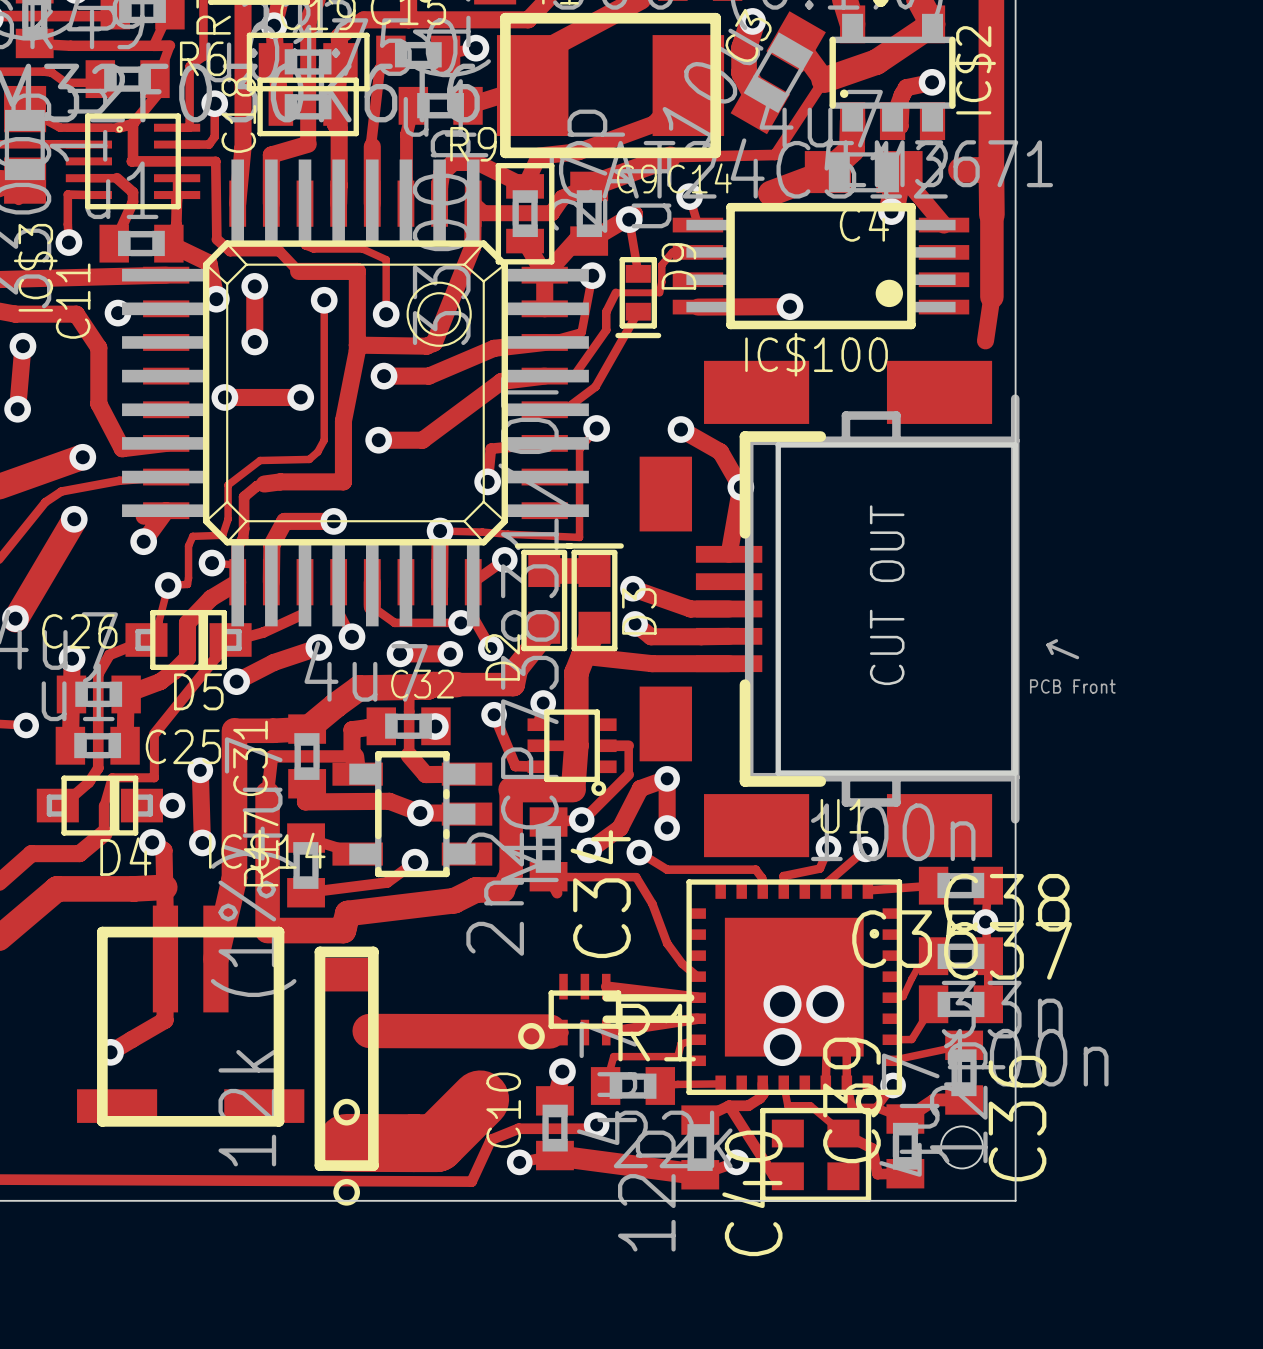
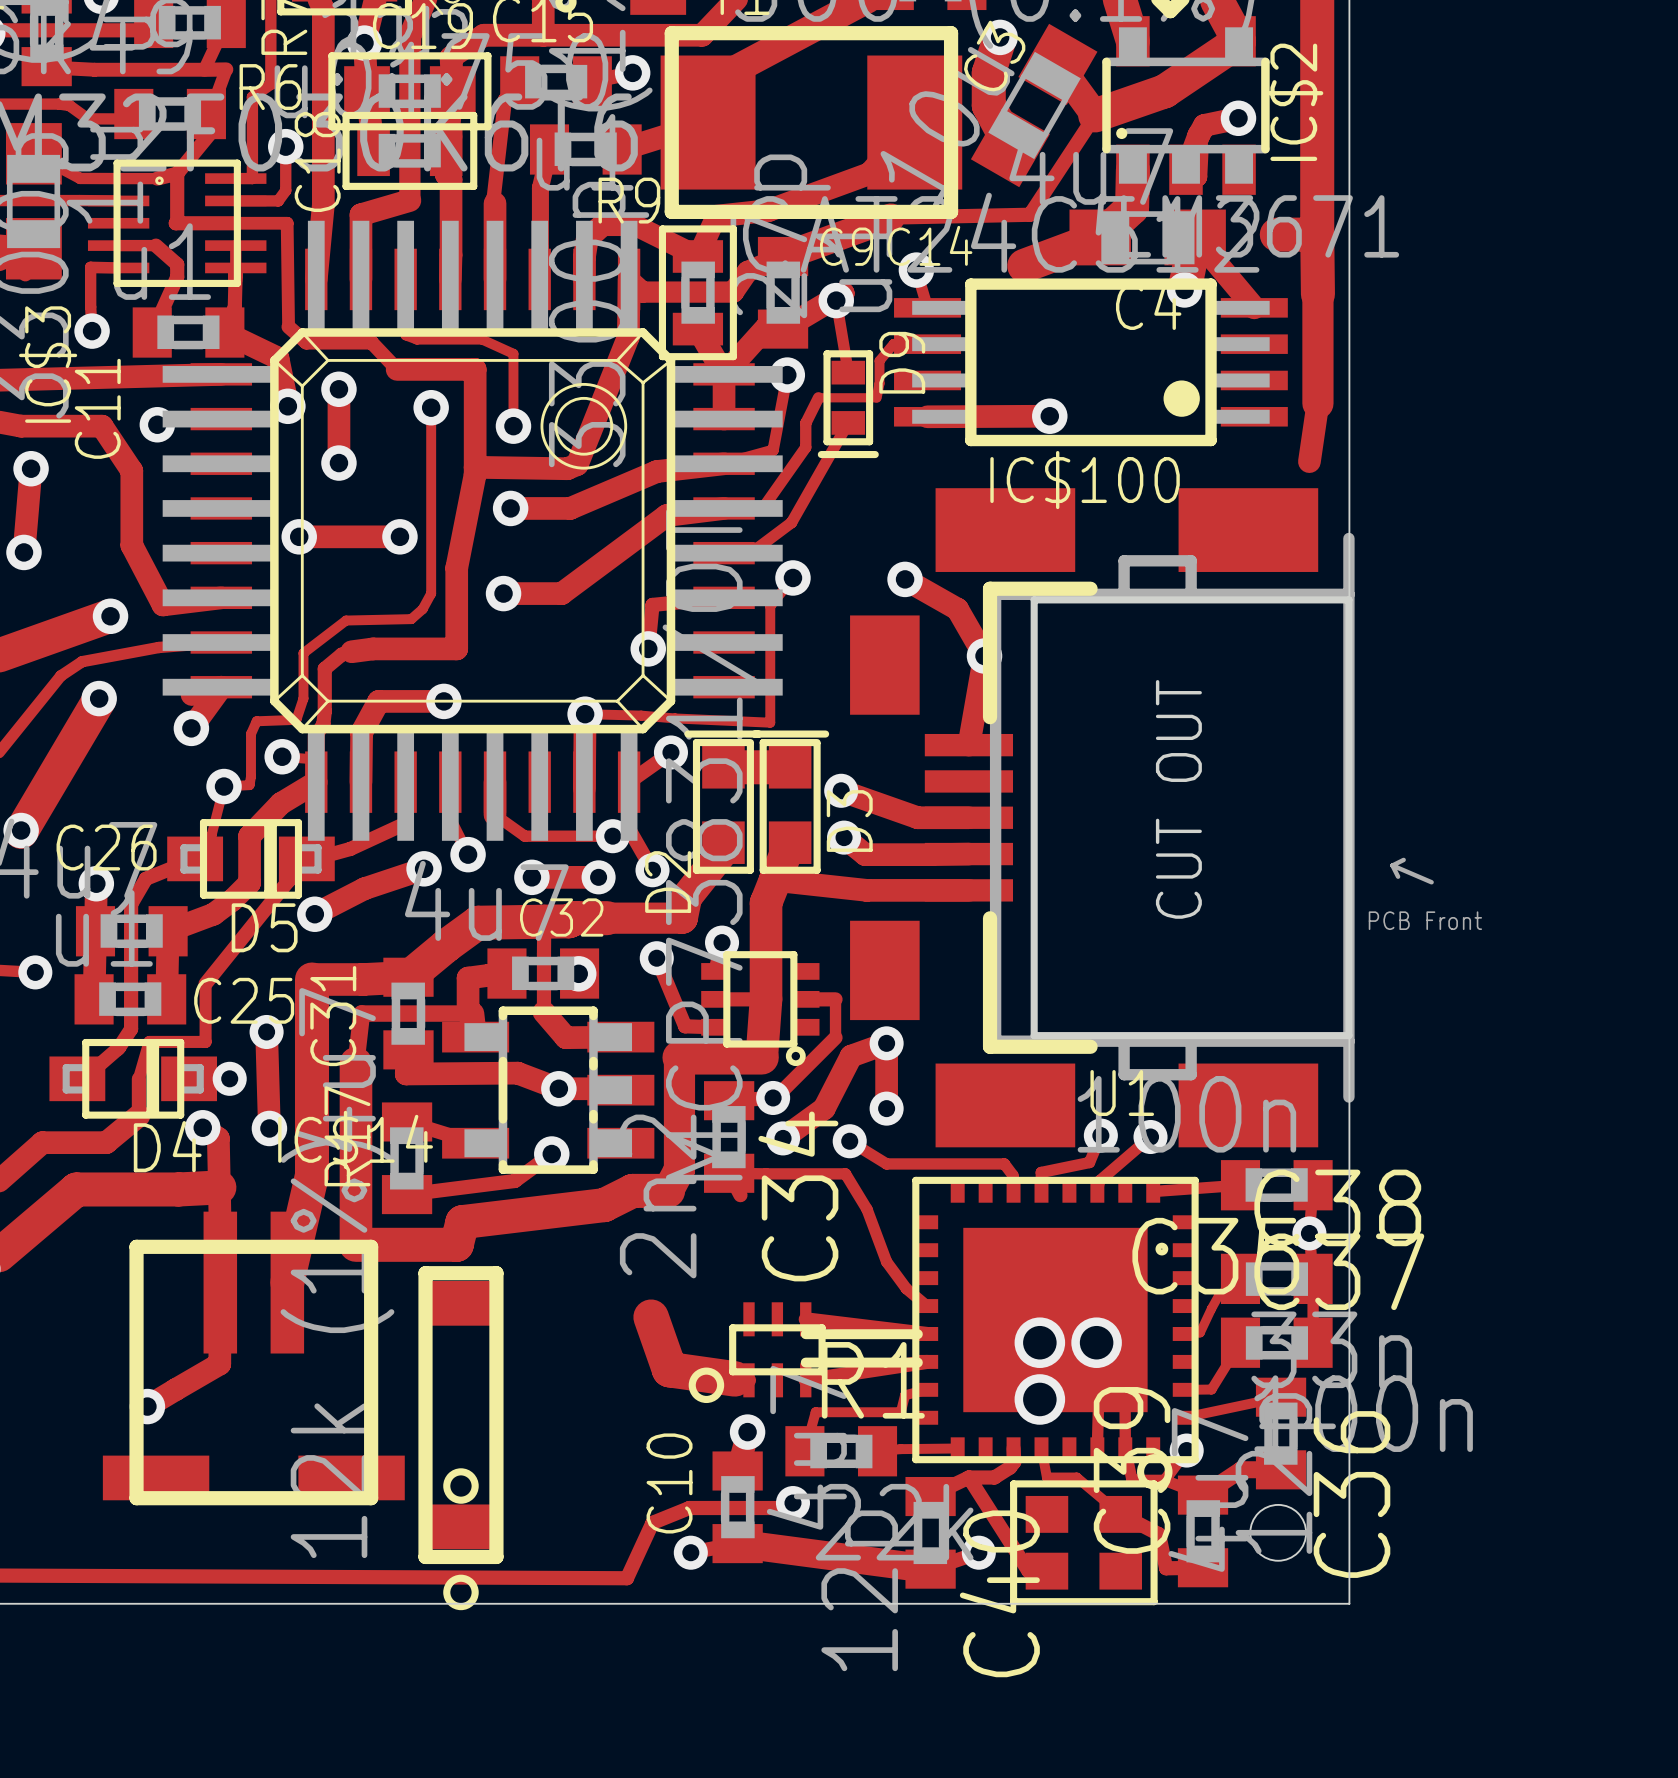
track: (369, 1030) (563, 1032) -> (651, 1317) (669, 1369) (748, 1380)
track: (480, 1099) (436, 1143) (346, 1142) -> none

